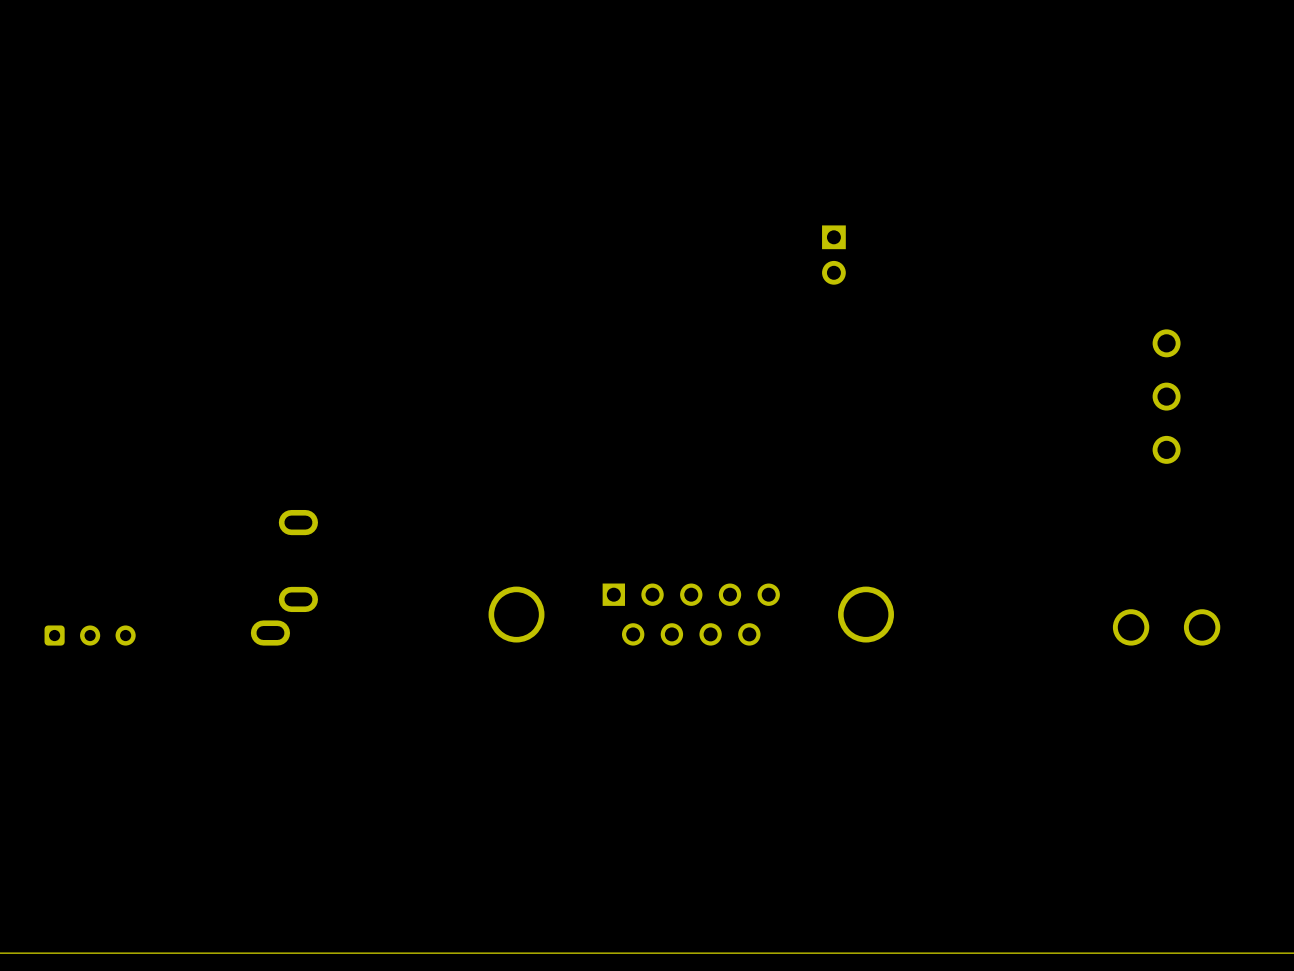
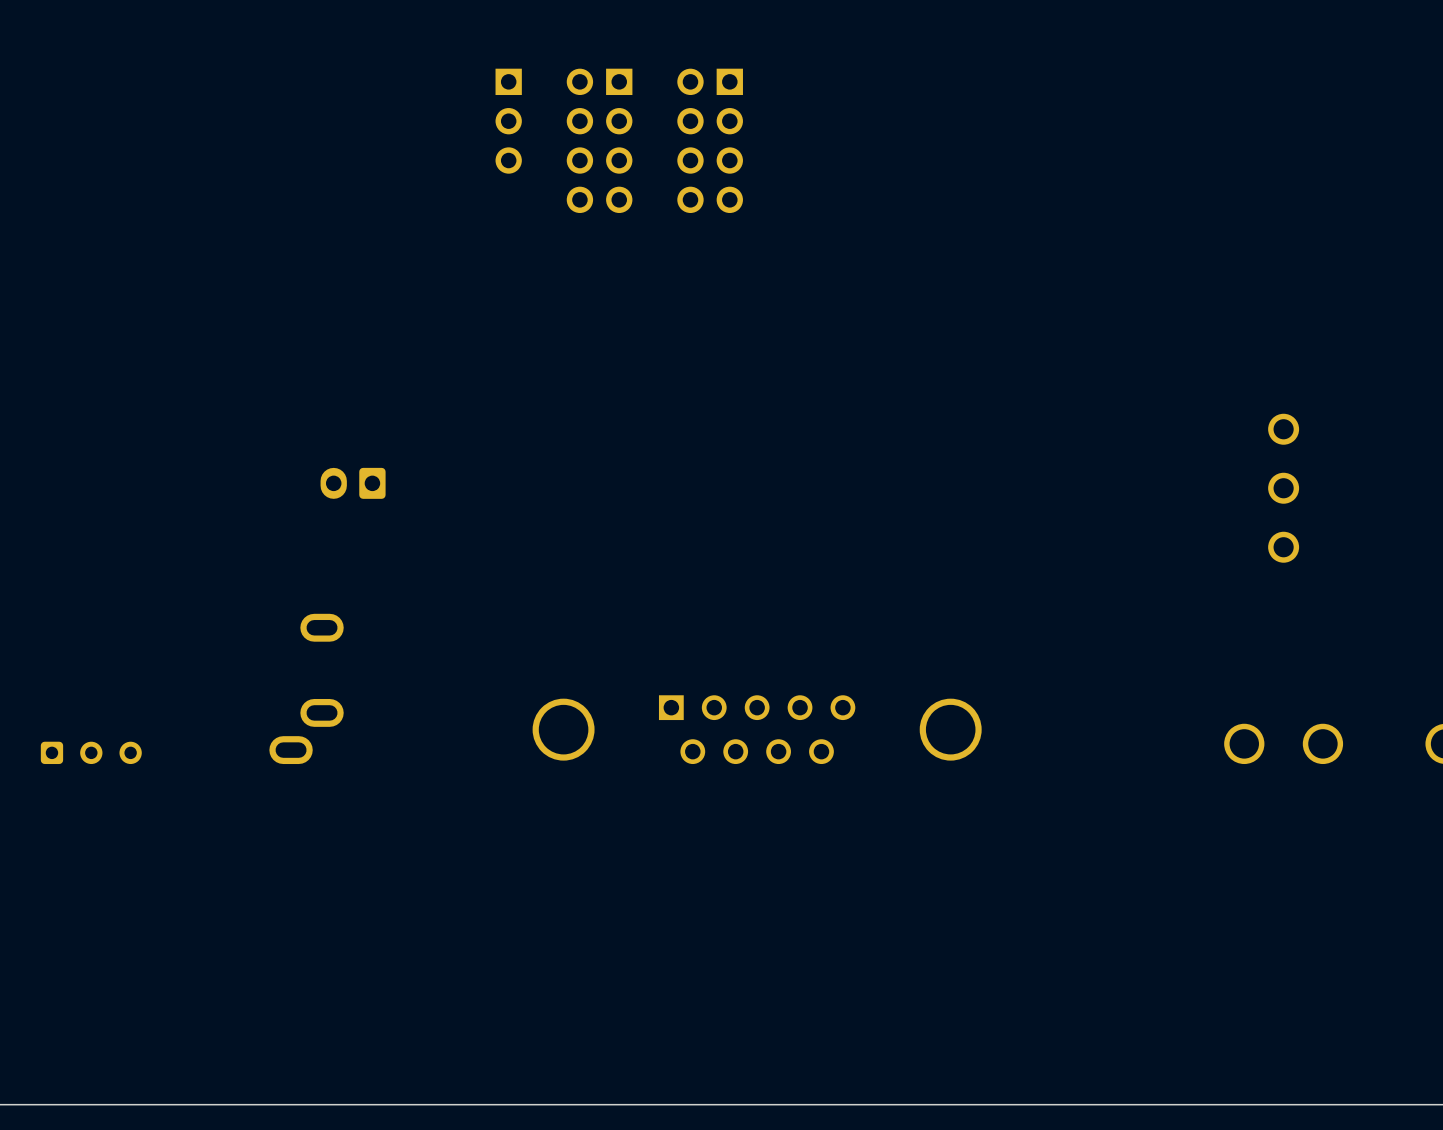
part: none -> (508, 121)
part: none -> (599, 140)
part: none -> (710, 140)
part: (833, 255) -> none
part: none -> (353, 483)

